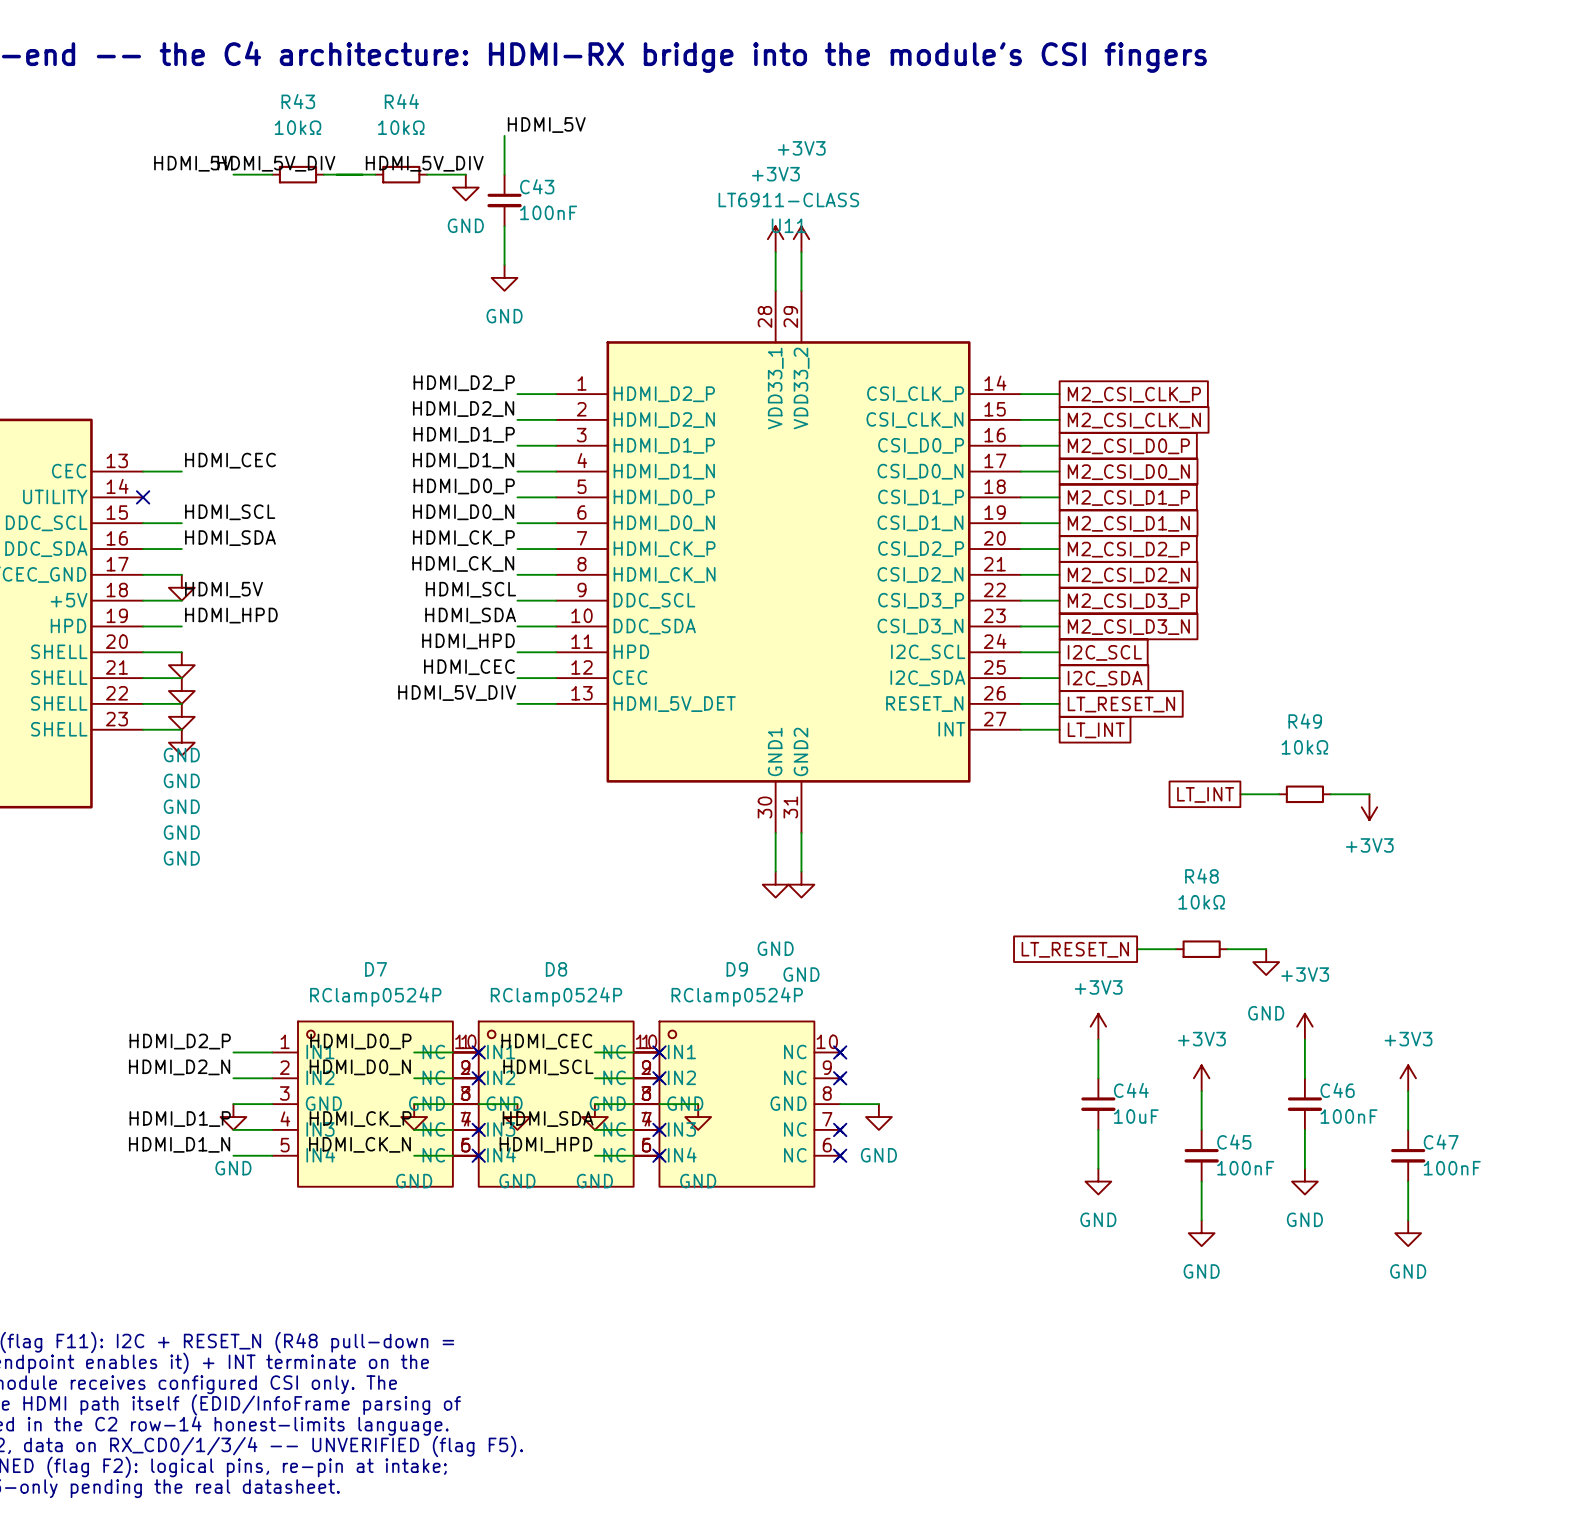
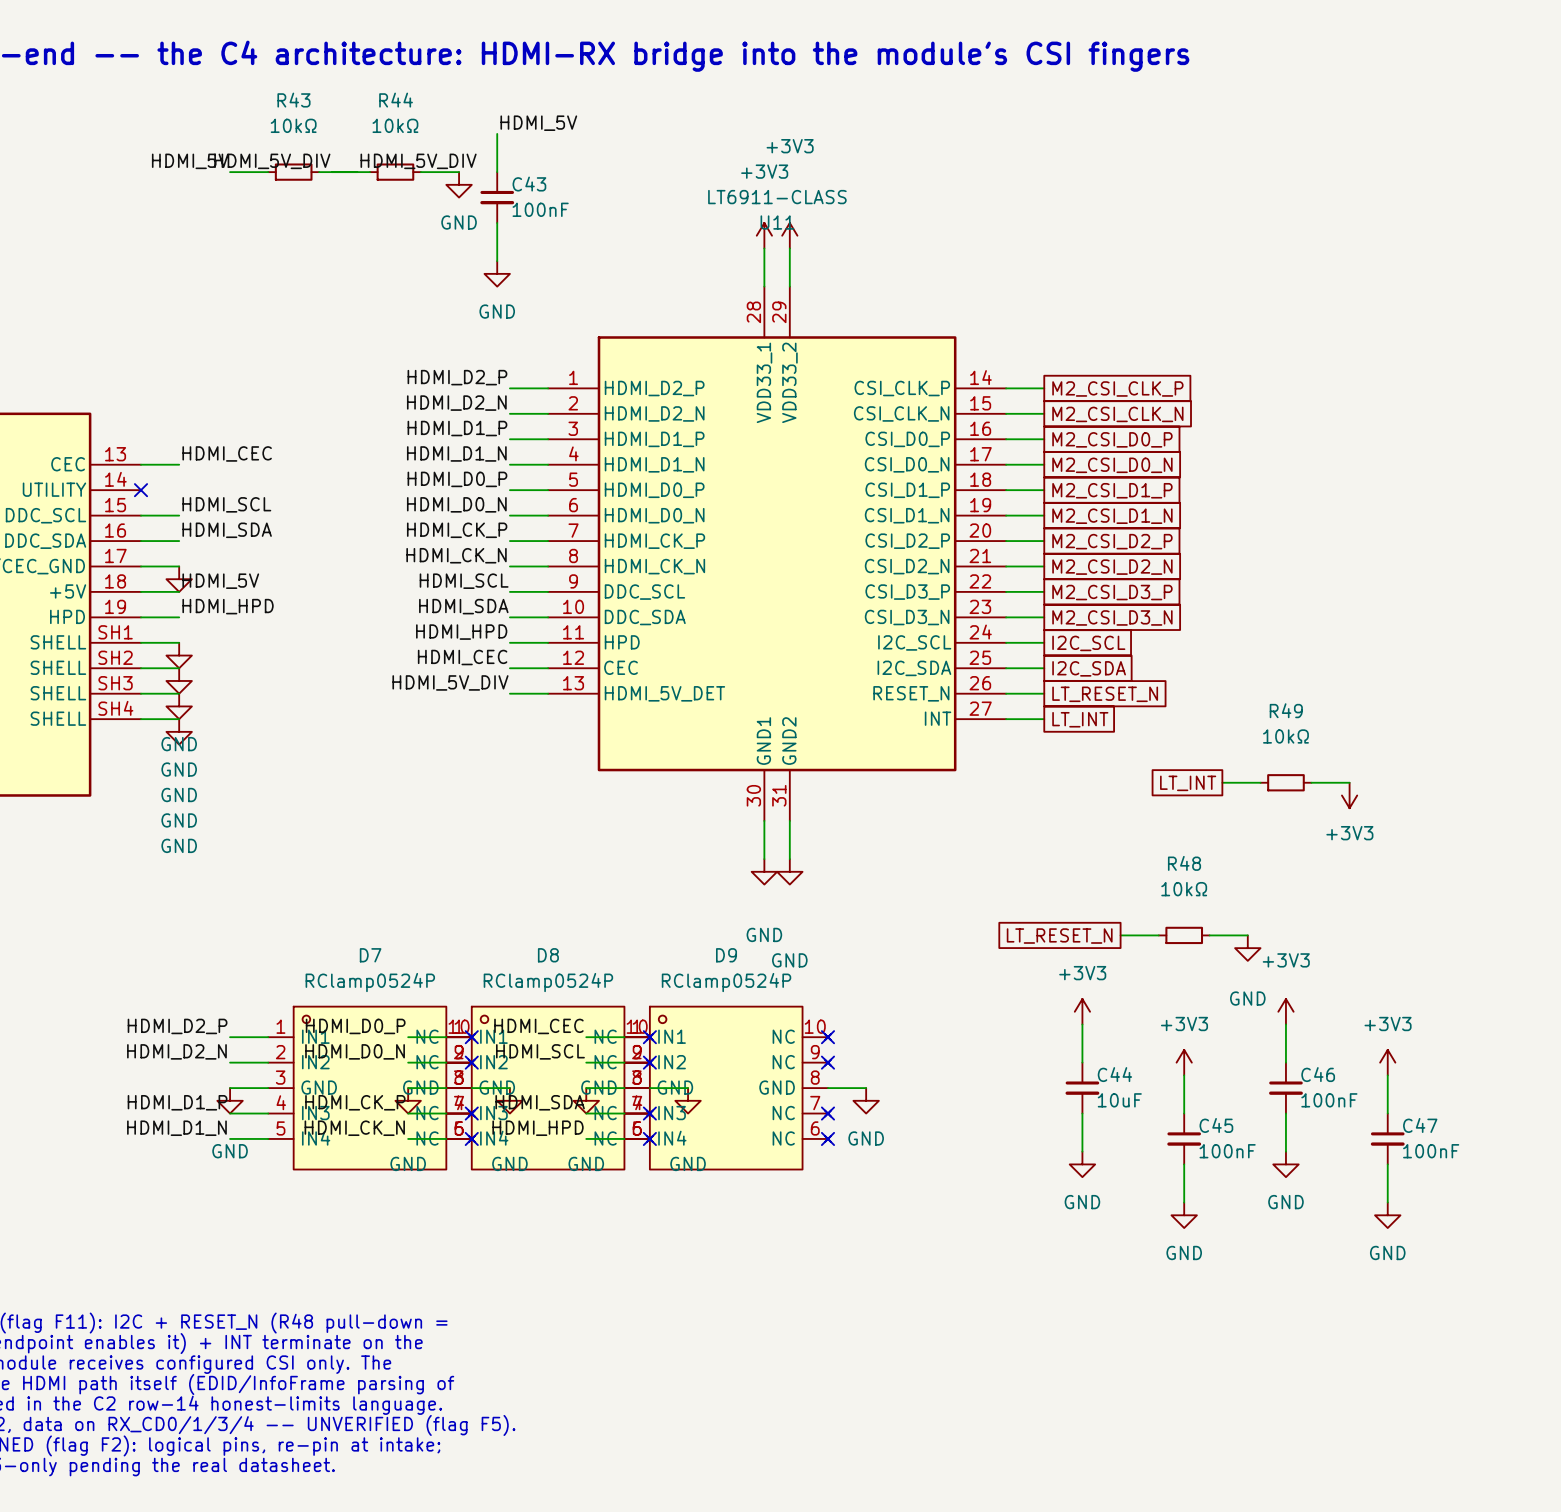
part pin number: 20 (116, 641) -> SH1 (115, 632)
part pin number: 21 (116, 667) -> SH2 (115, 657)
part pin number: 22 (116, 693) -> SH3 (115, 683)
part pin number: 23 (116, 719) -> SH4 (115, 708)

